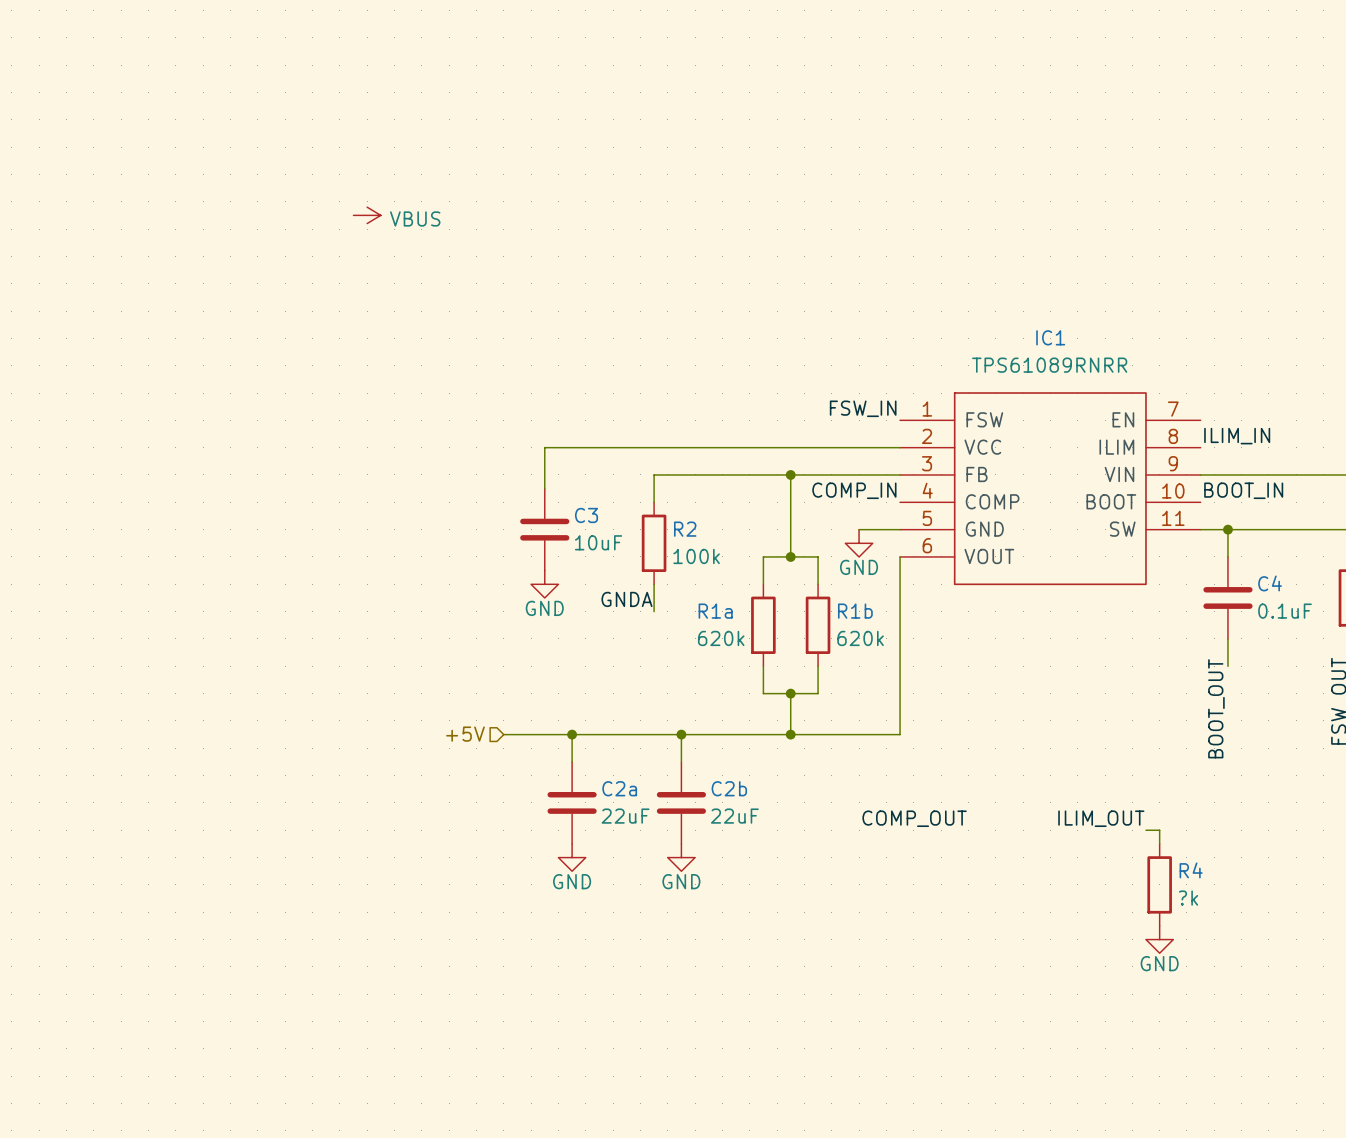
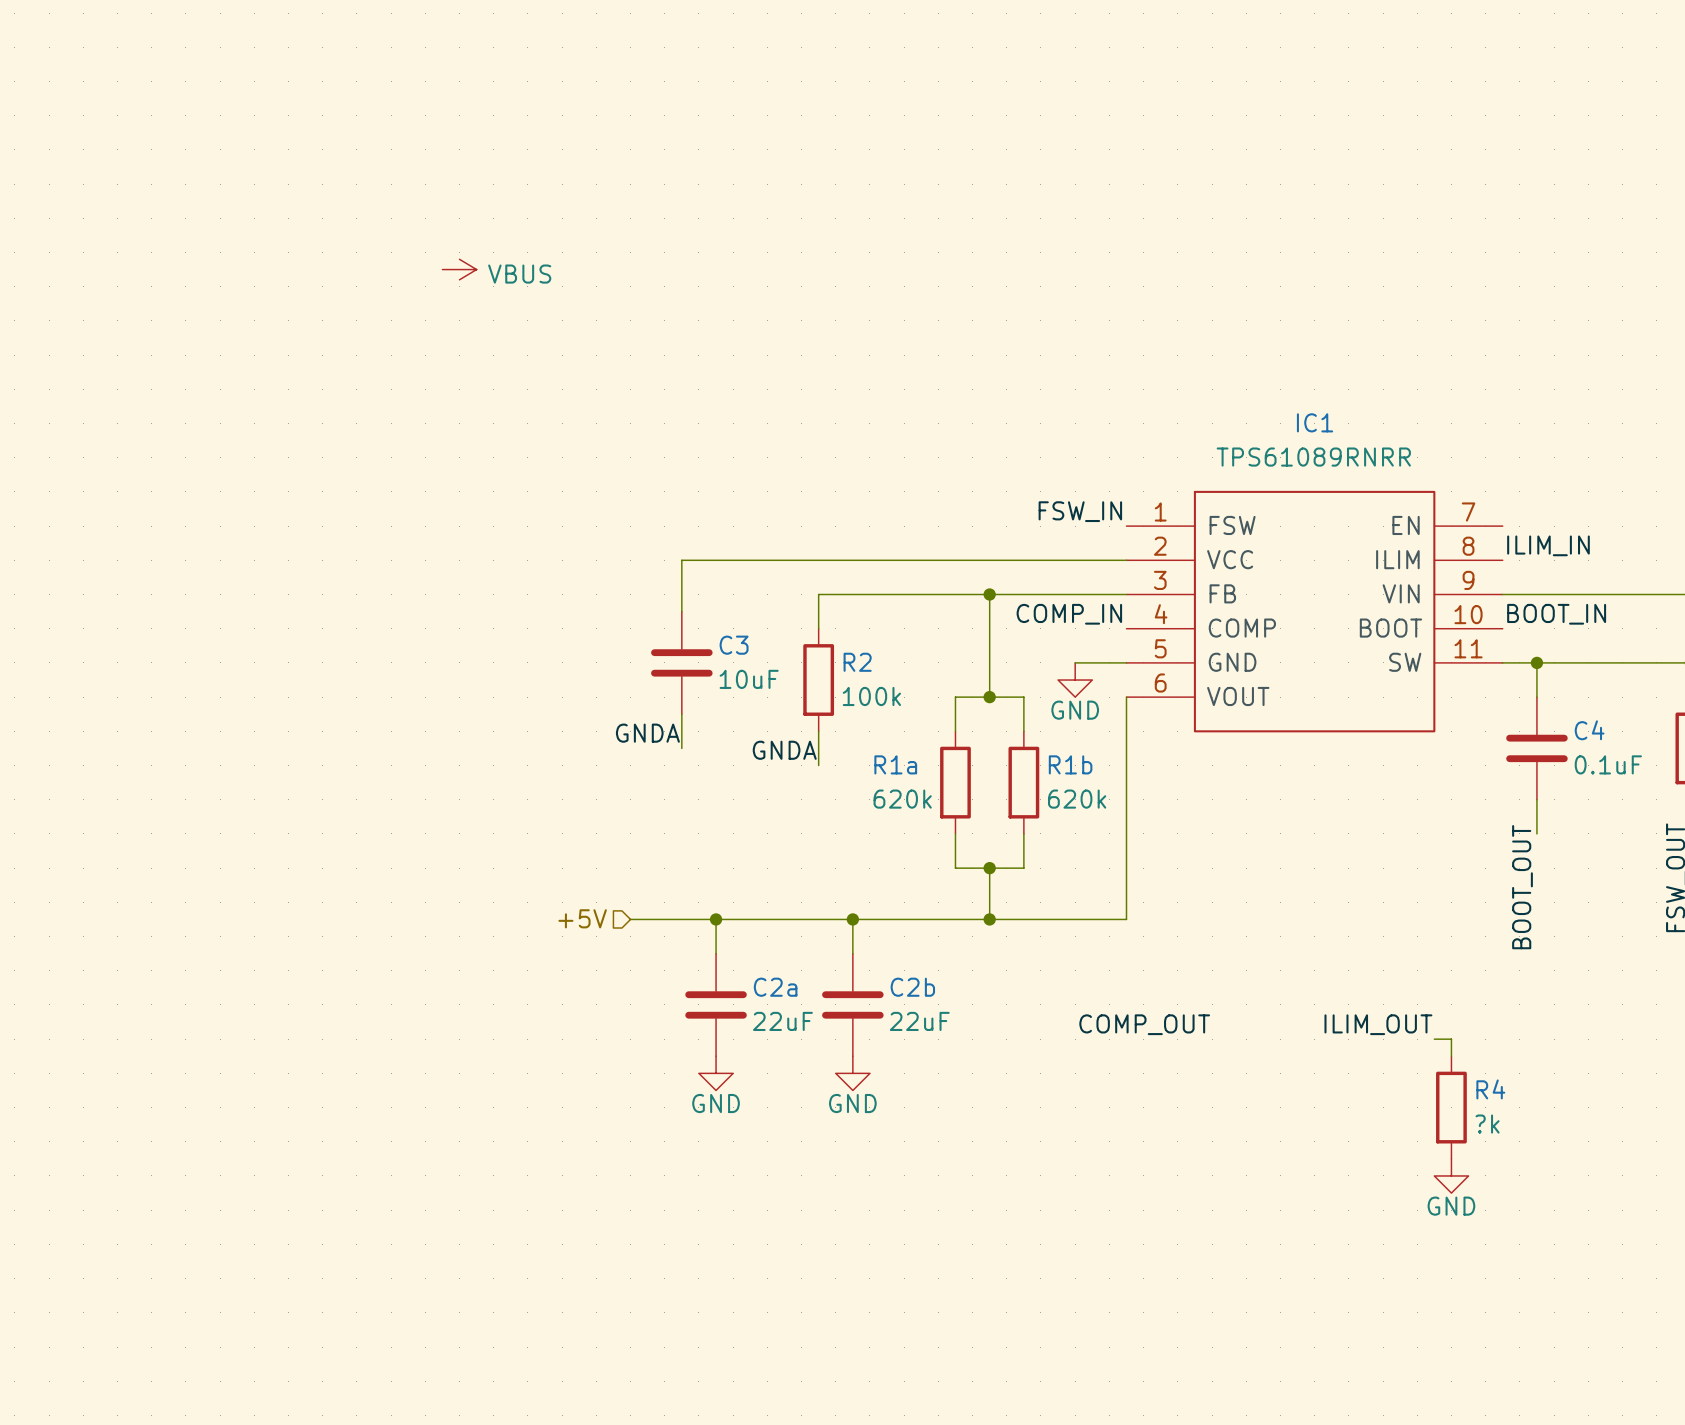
power symbol: GND (544, 584) -> none
label: none -> GNDA (647, 733)

